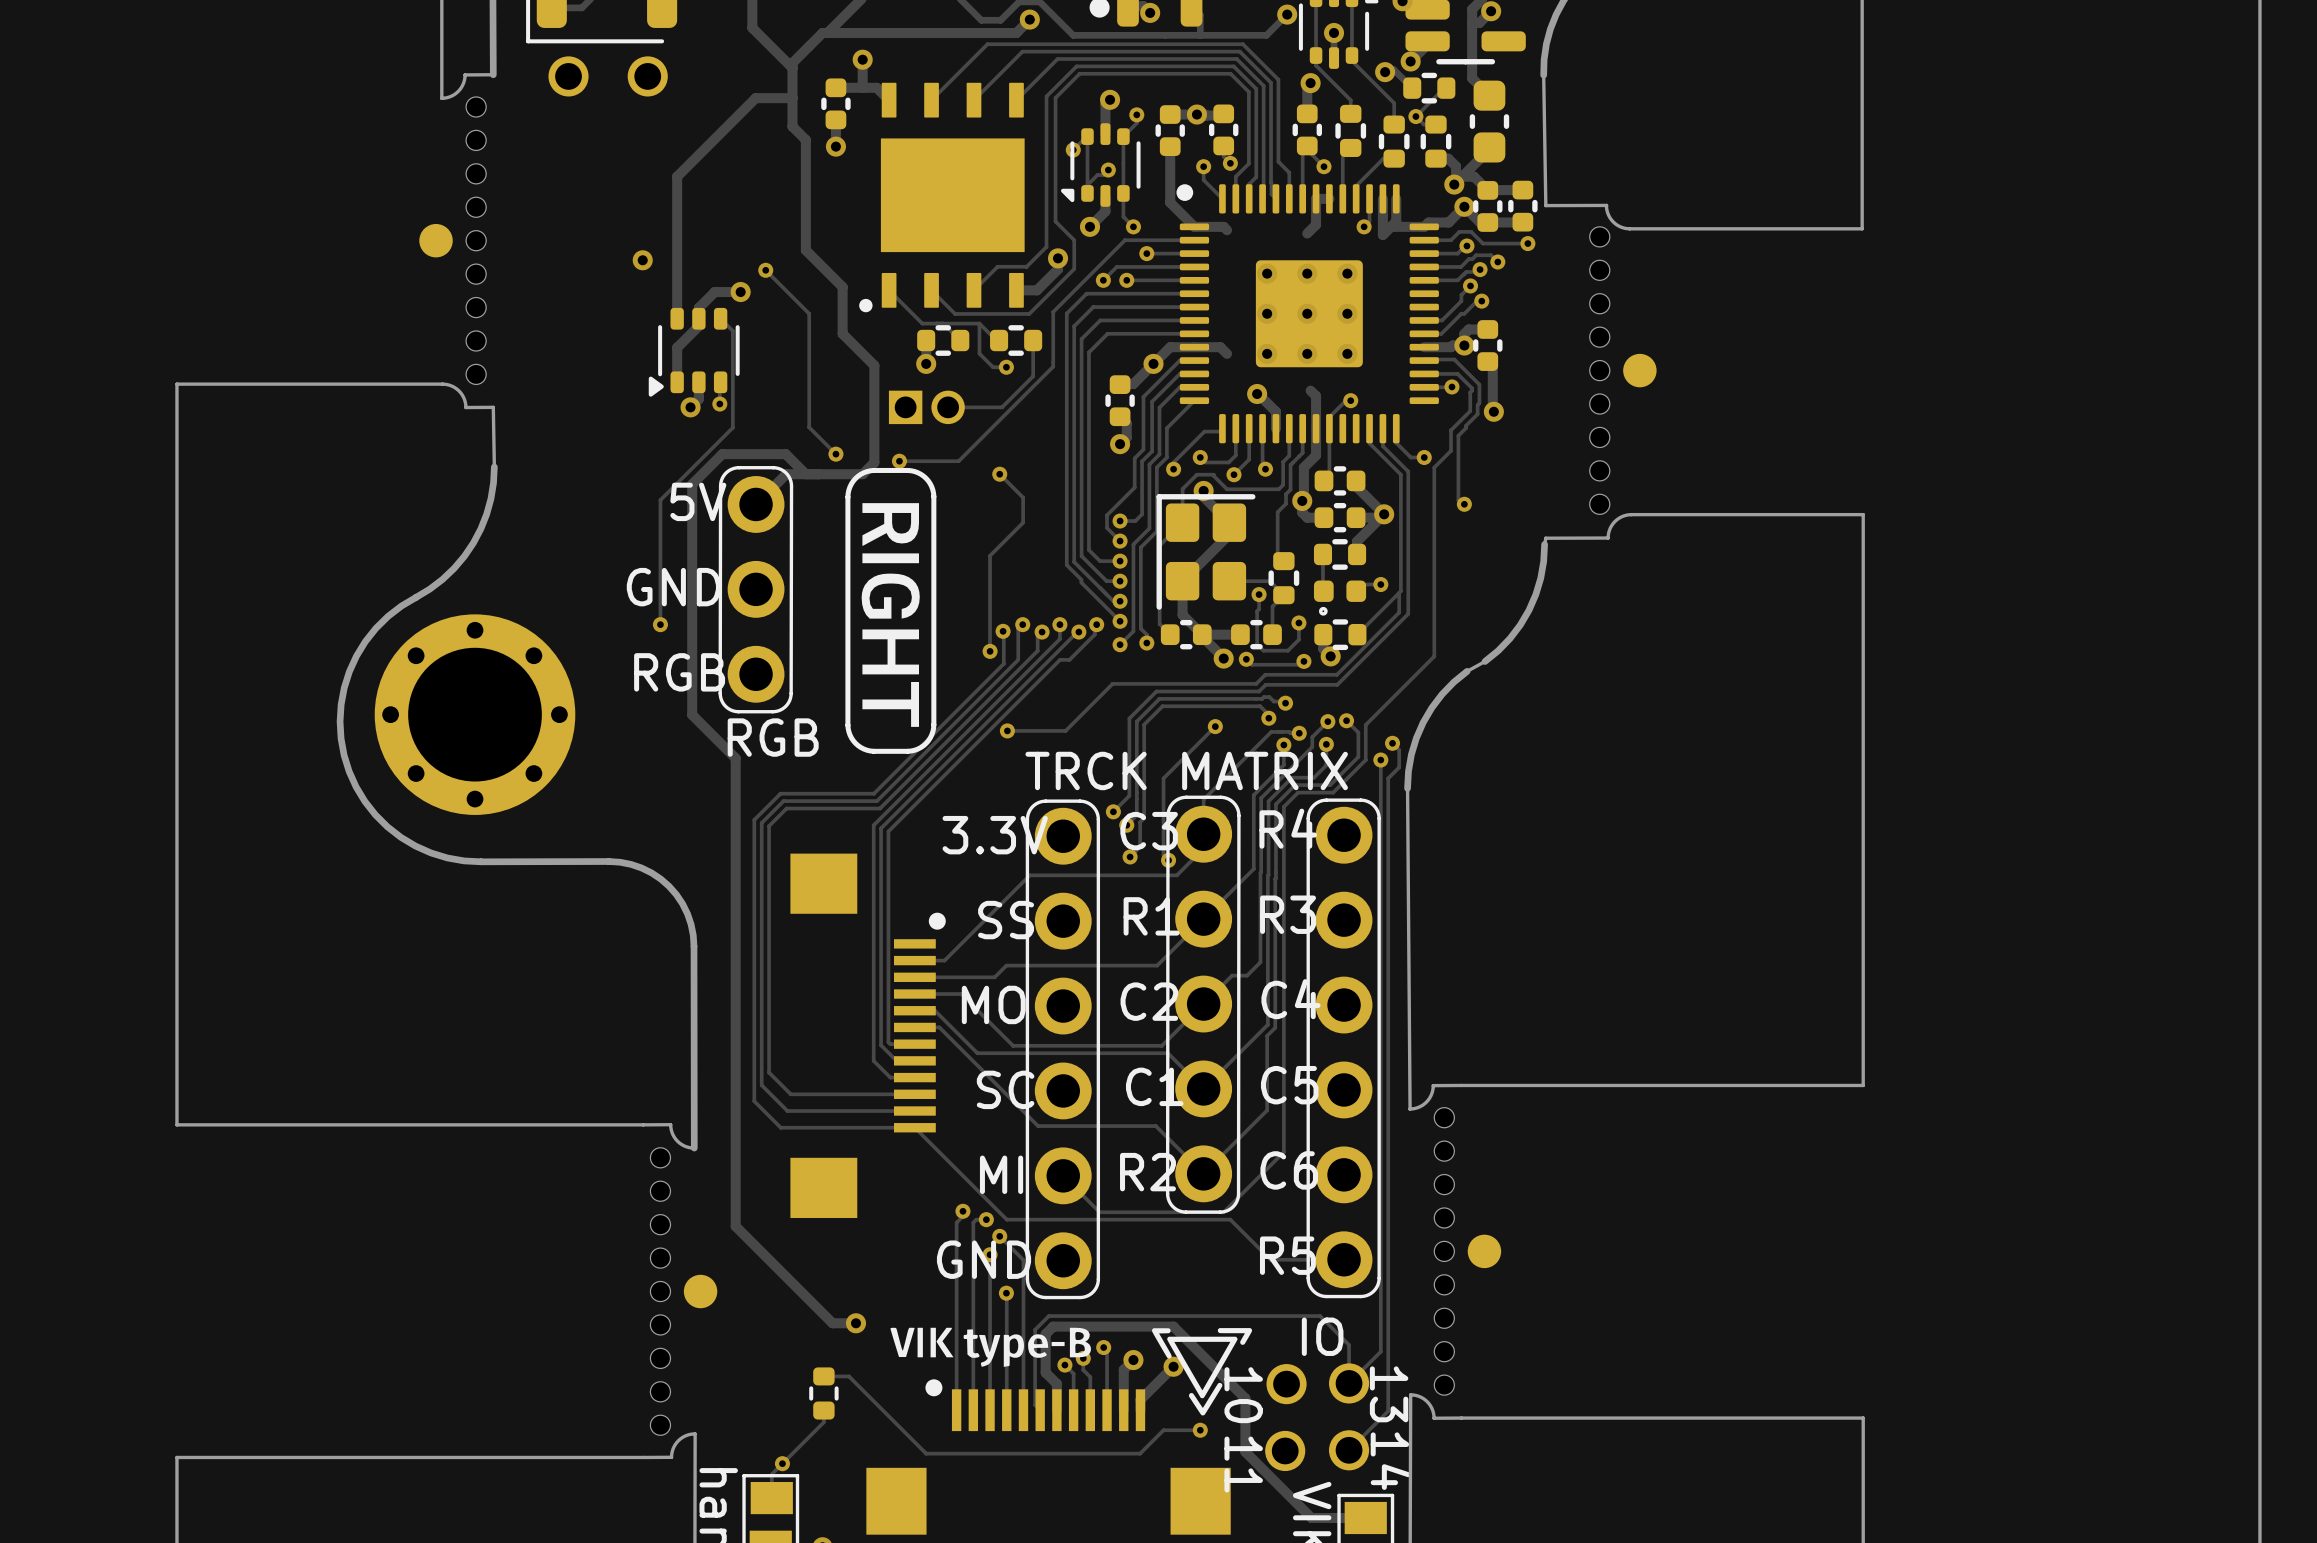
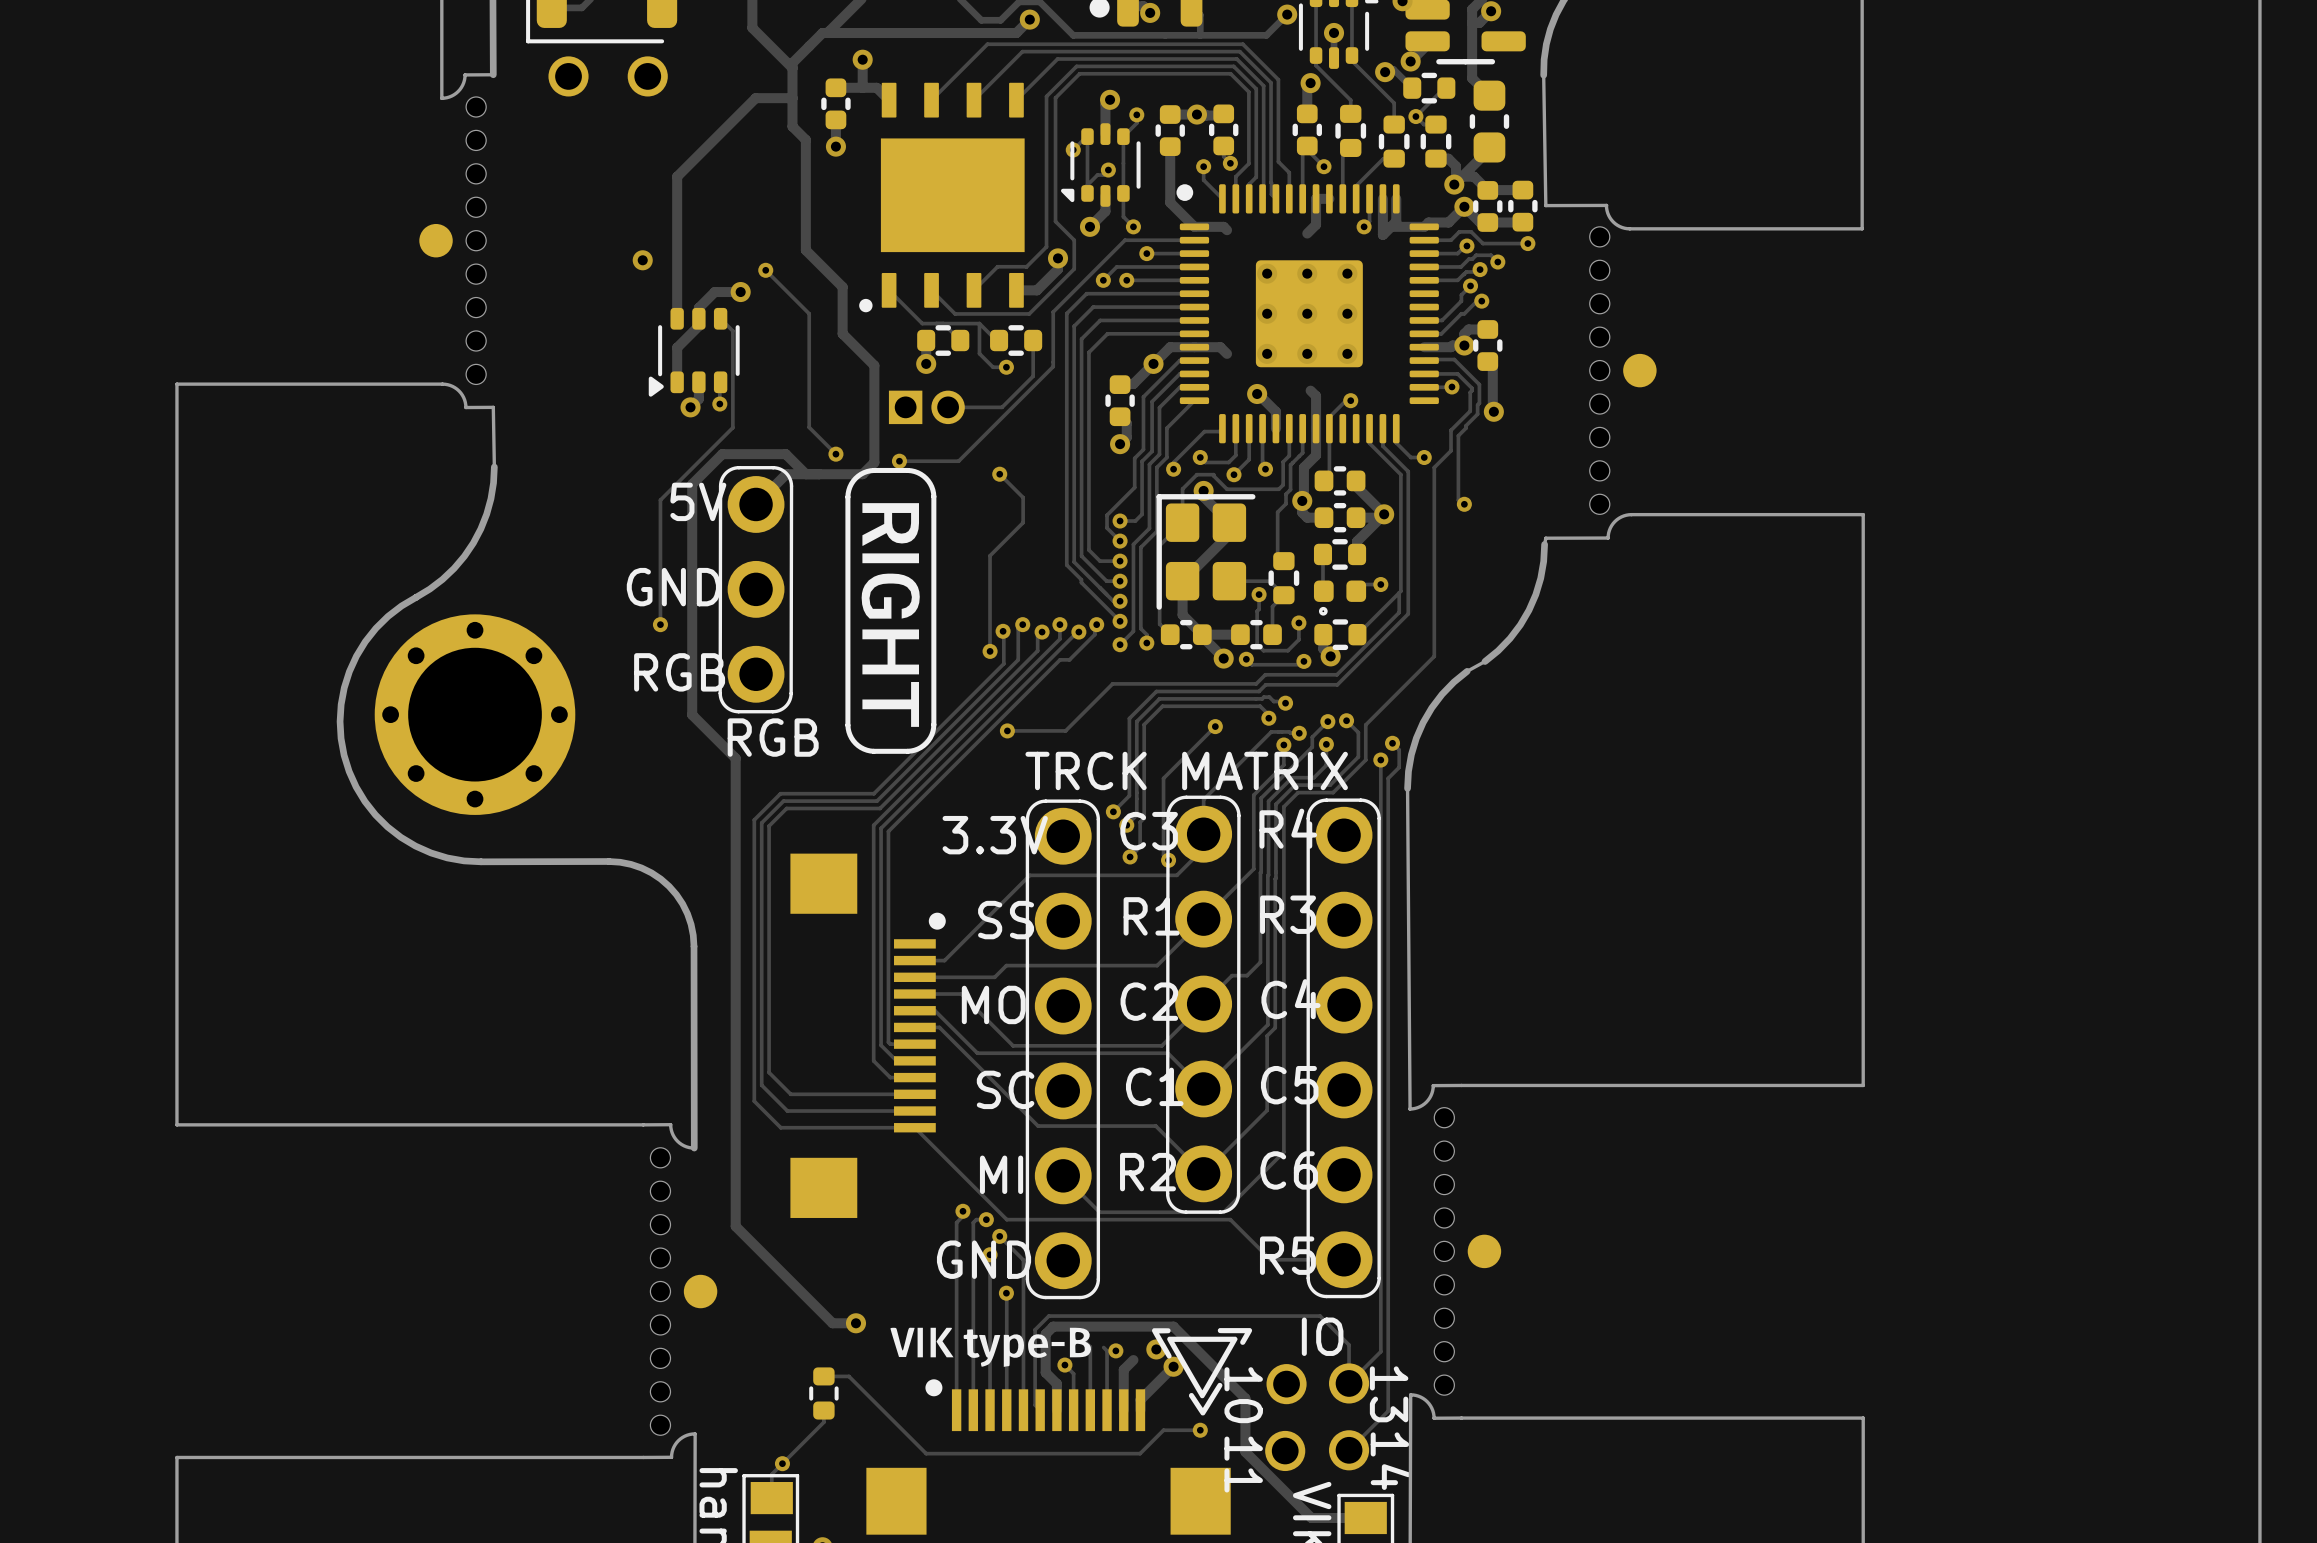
via position: (1103, 1347) -> (1115, 1350)
track: (1083, 1358) (1083, 1370) (1090, 1377) -> (1086, 1342) (1090, 1346) (1090, 1377)
via: (1083, 1358) -> none
via position: (1133, 1360) -> (1156, 1349)

